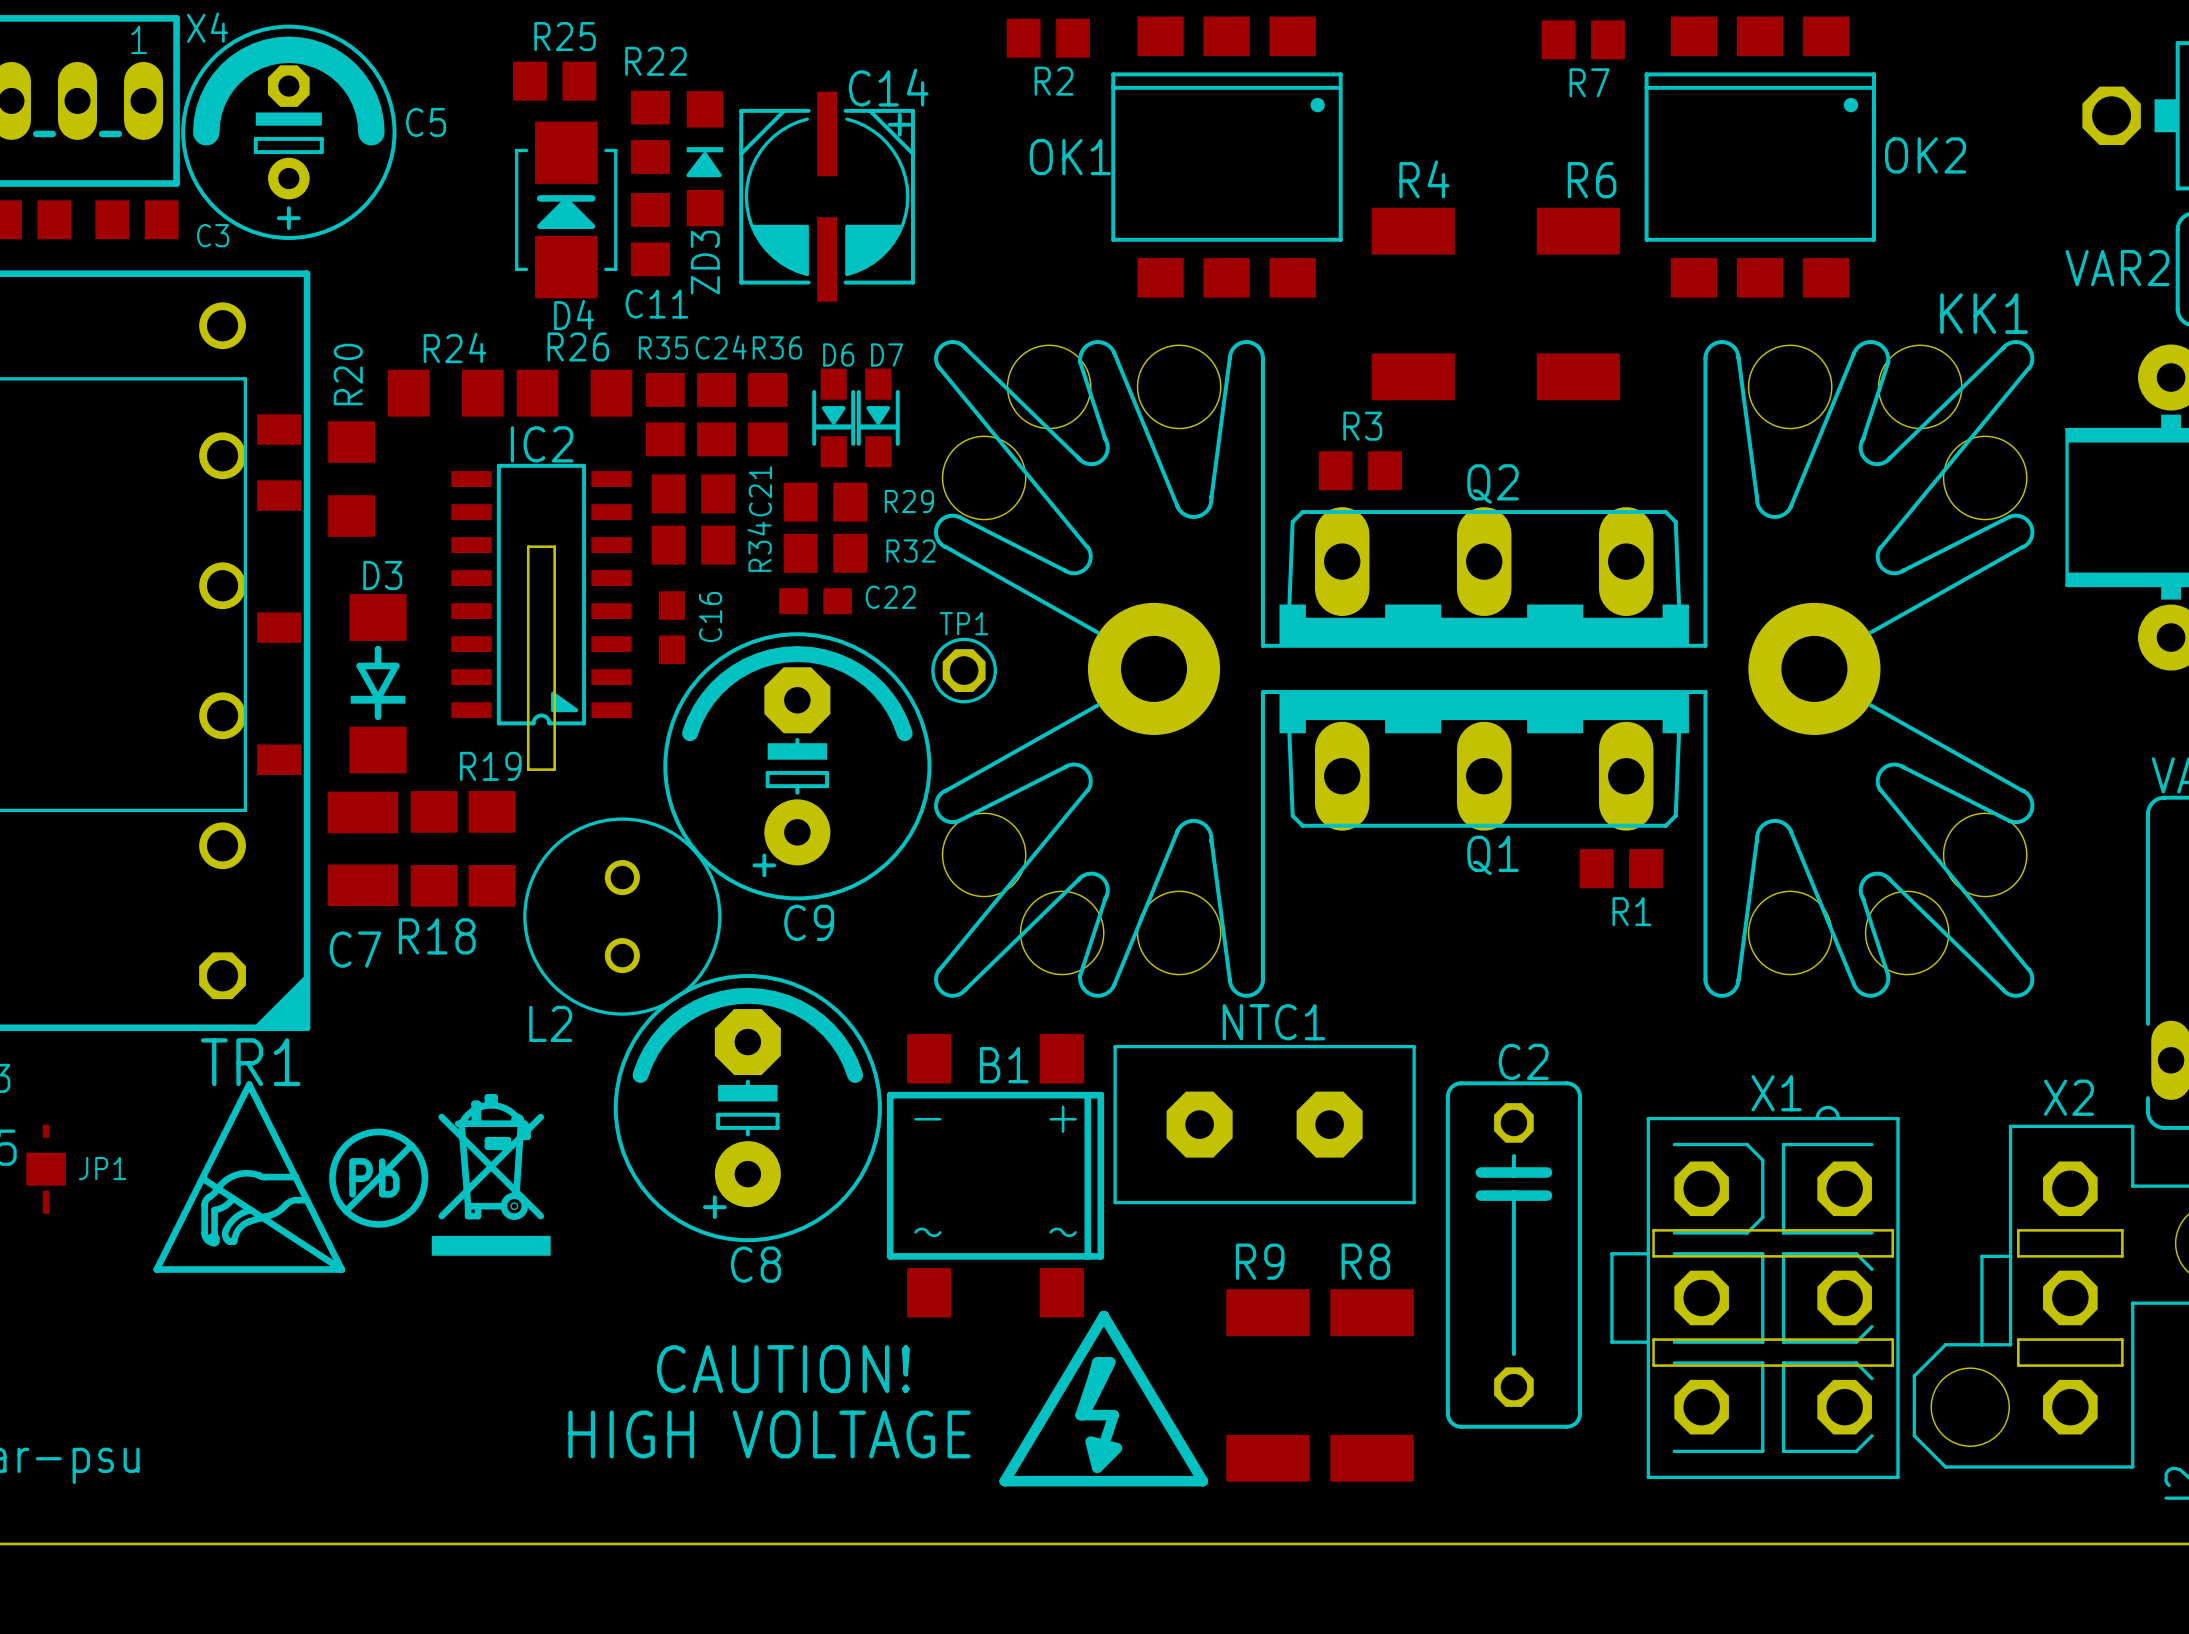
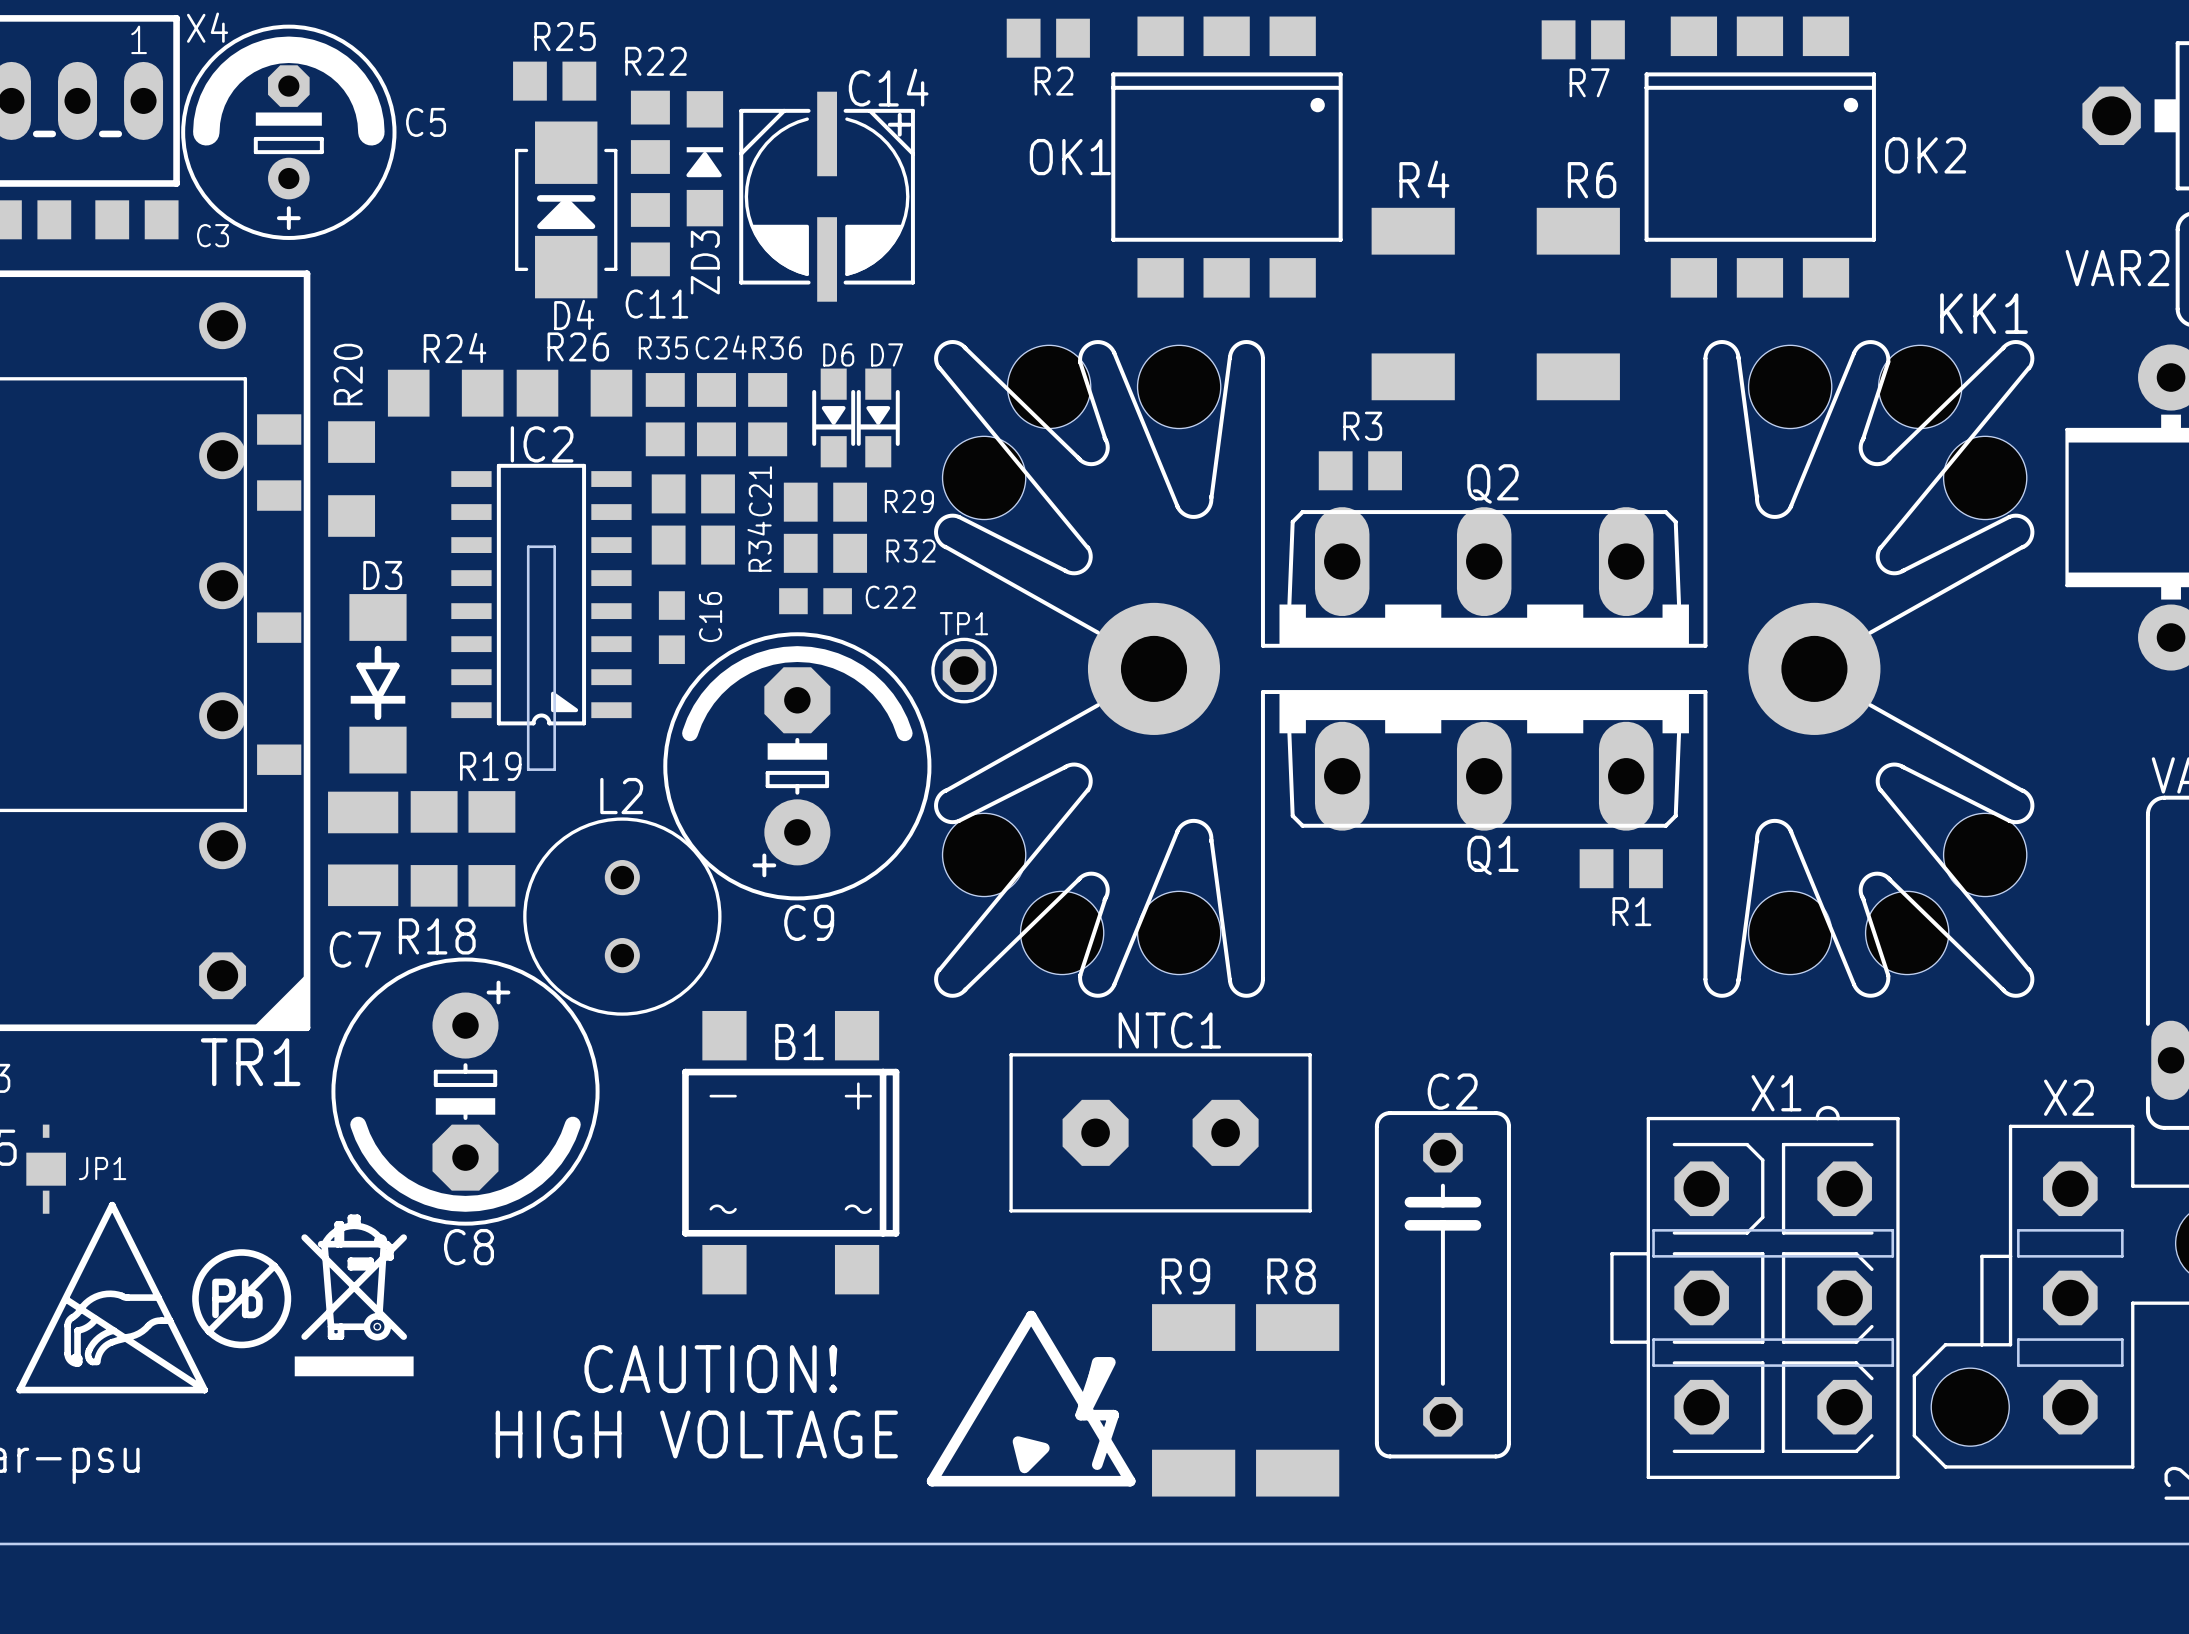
L2 name position: L2 (550, 1023) -> L2 (621, 796)
C8 rotation: 0° (747, 1108) -> 180° (465, 1091)
C8 position: (747, 1108) -> (465, 1091)
NTC1 position: (1264, 1124) -> (1160, 1132)
drawing position: (491, 1174) -> (354, 1295)
B1 position: (995, 1175) -> (790, 1152)
drawing position: (249, 1177) -> (112, 1297)
drawing position: (378, 1178) -> (241, 1298)
C2 position: (1513, 1255) -> (1442, 1284)
text position: CAUTION! (783, 1369) -> CAUTION! (710, 1369)
R9 position: (1267, 1385) -> (1193, 1400)
R8 position: (1371, 1385) -> (1297, 1400)
text position: HIGH VOLTAGE (769, 1434) -> HIGH VOLTAGE (696, 1434)
drawing position: (1103, 1454) -> (1031, 1454)
line: (1004, 1481) (1103, 1316) (1202, 1481) (1130, 1481) -> (1004, 1481) (932, 1481) (1031, 1316) (1130, 1481)

